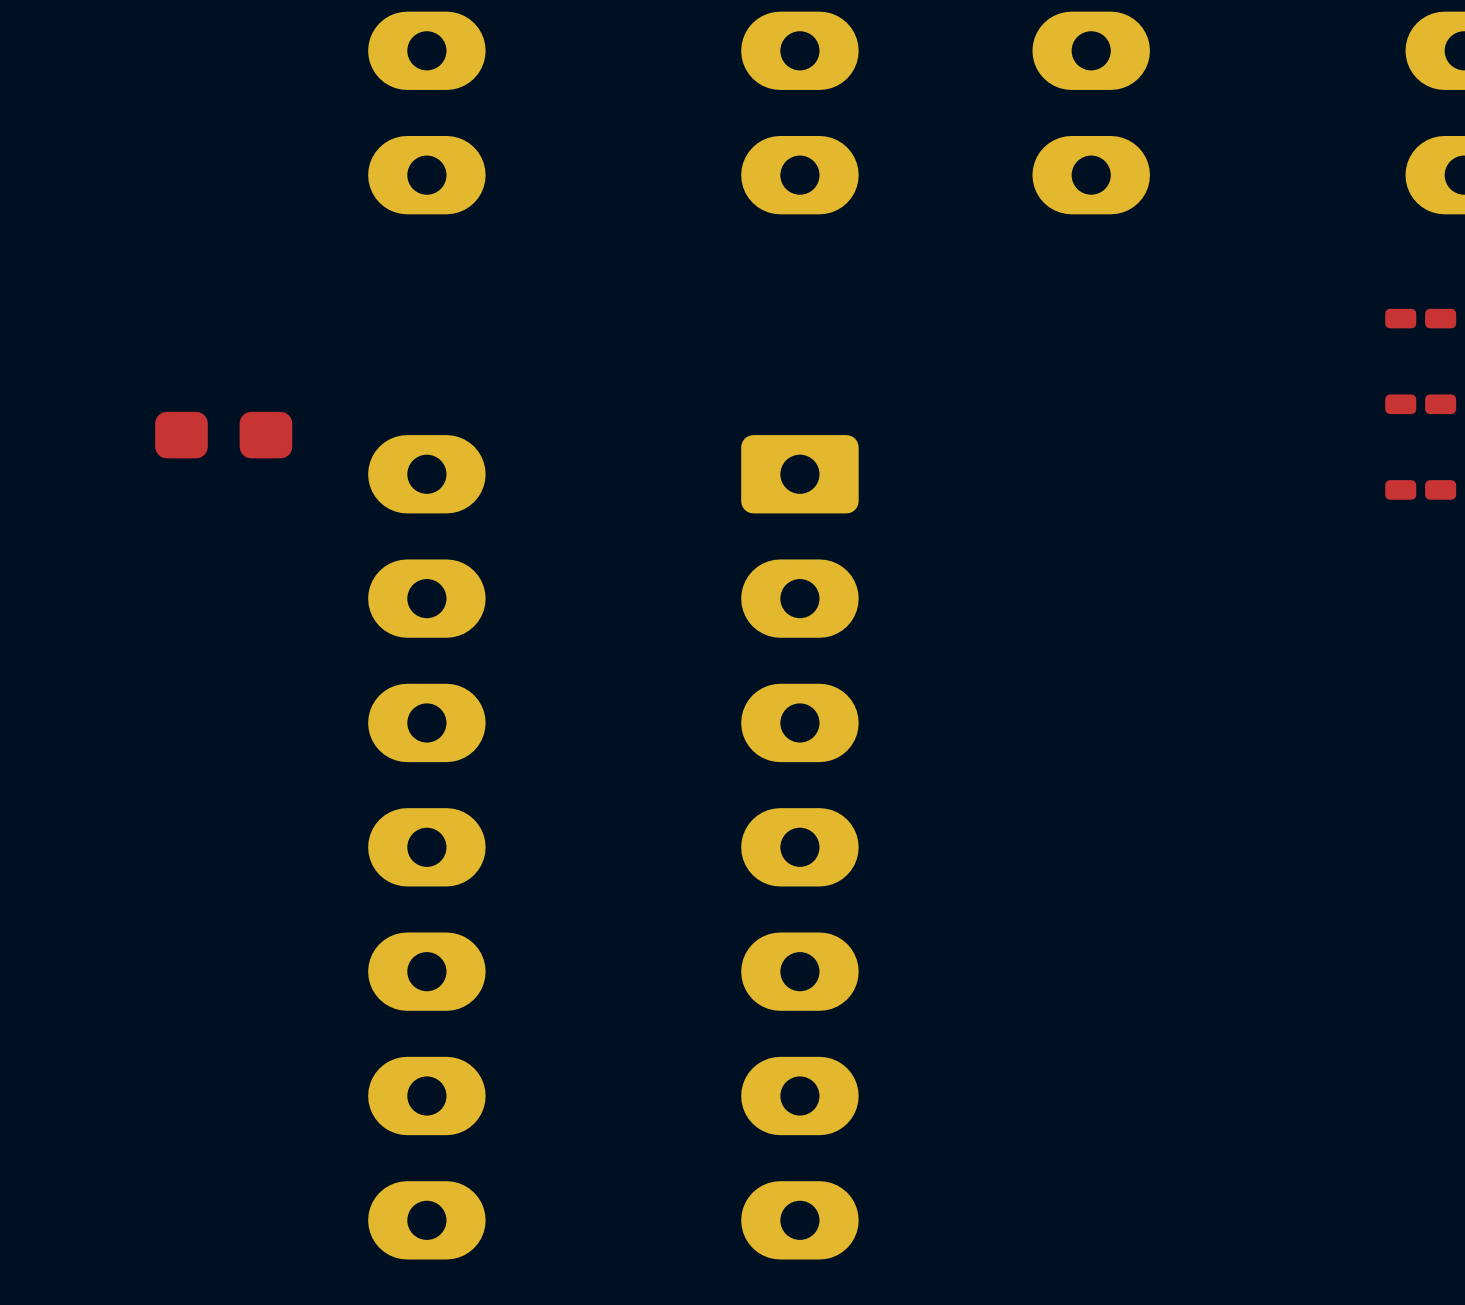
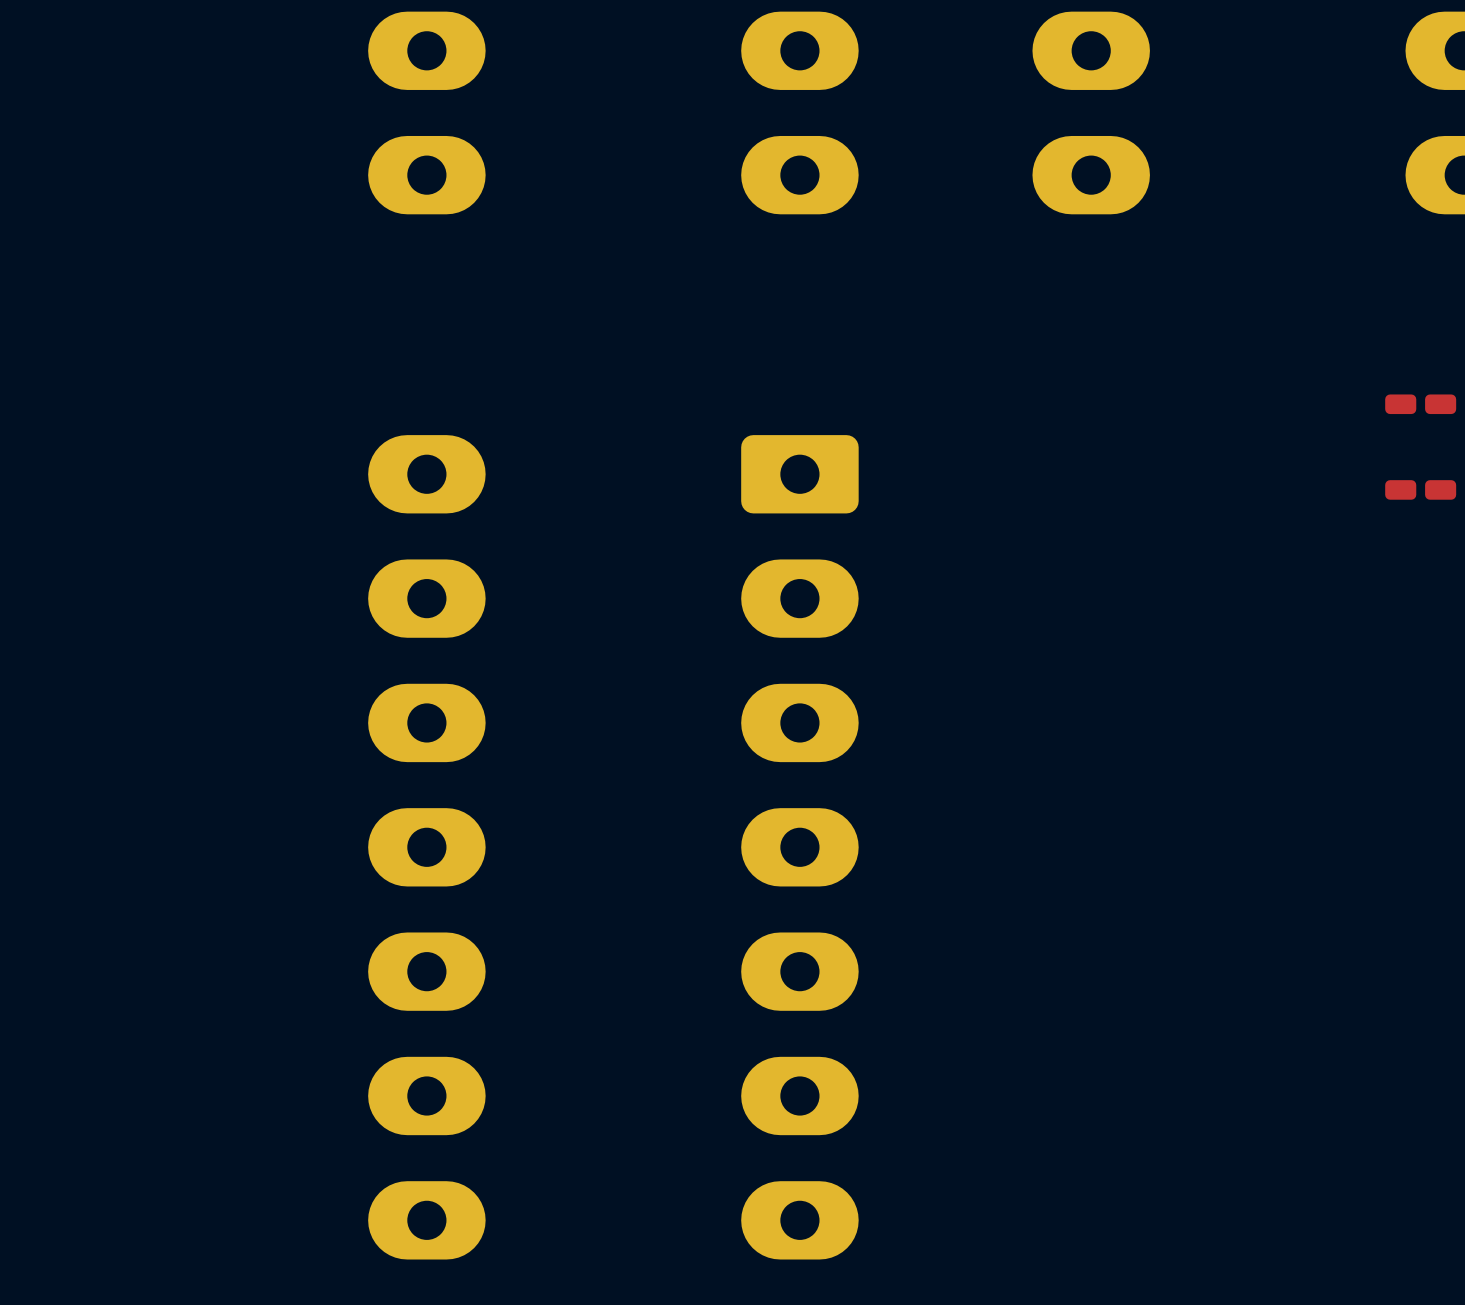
part: (1420, 318) -> none
part: (223, 435) -> none

